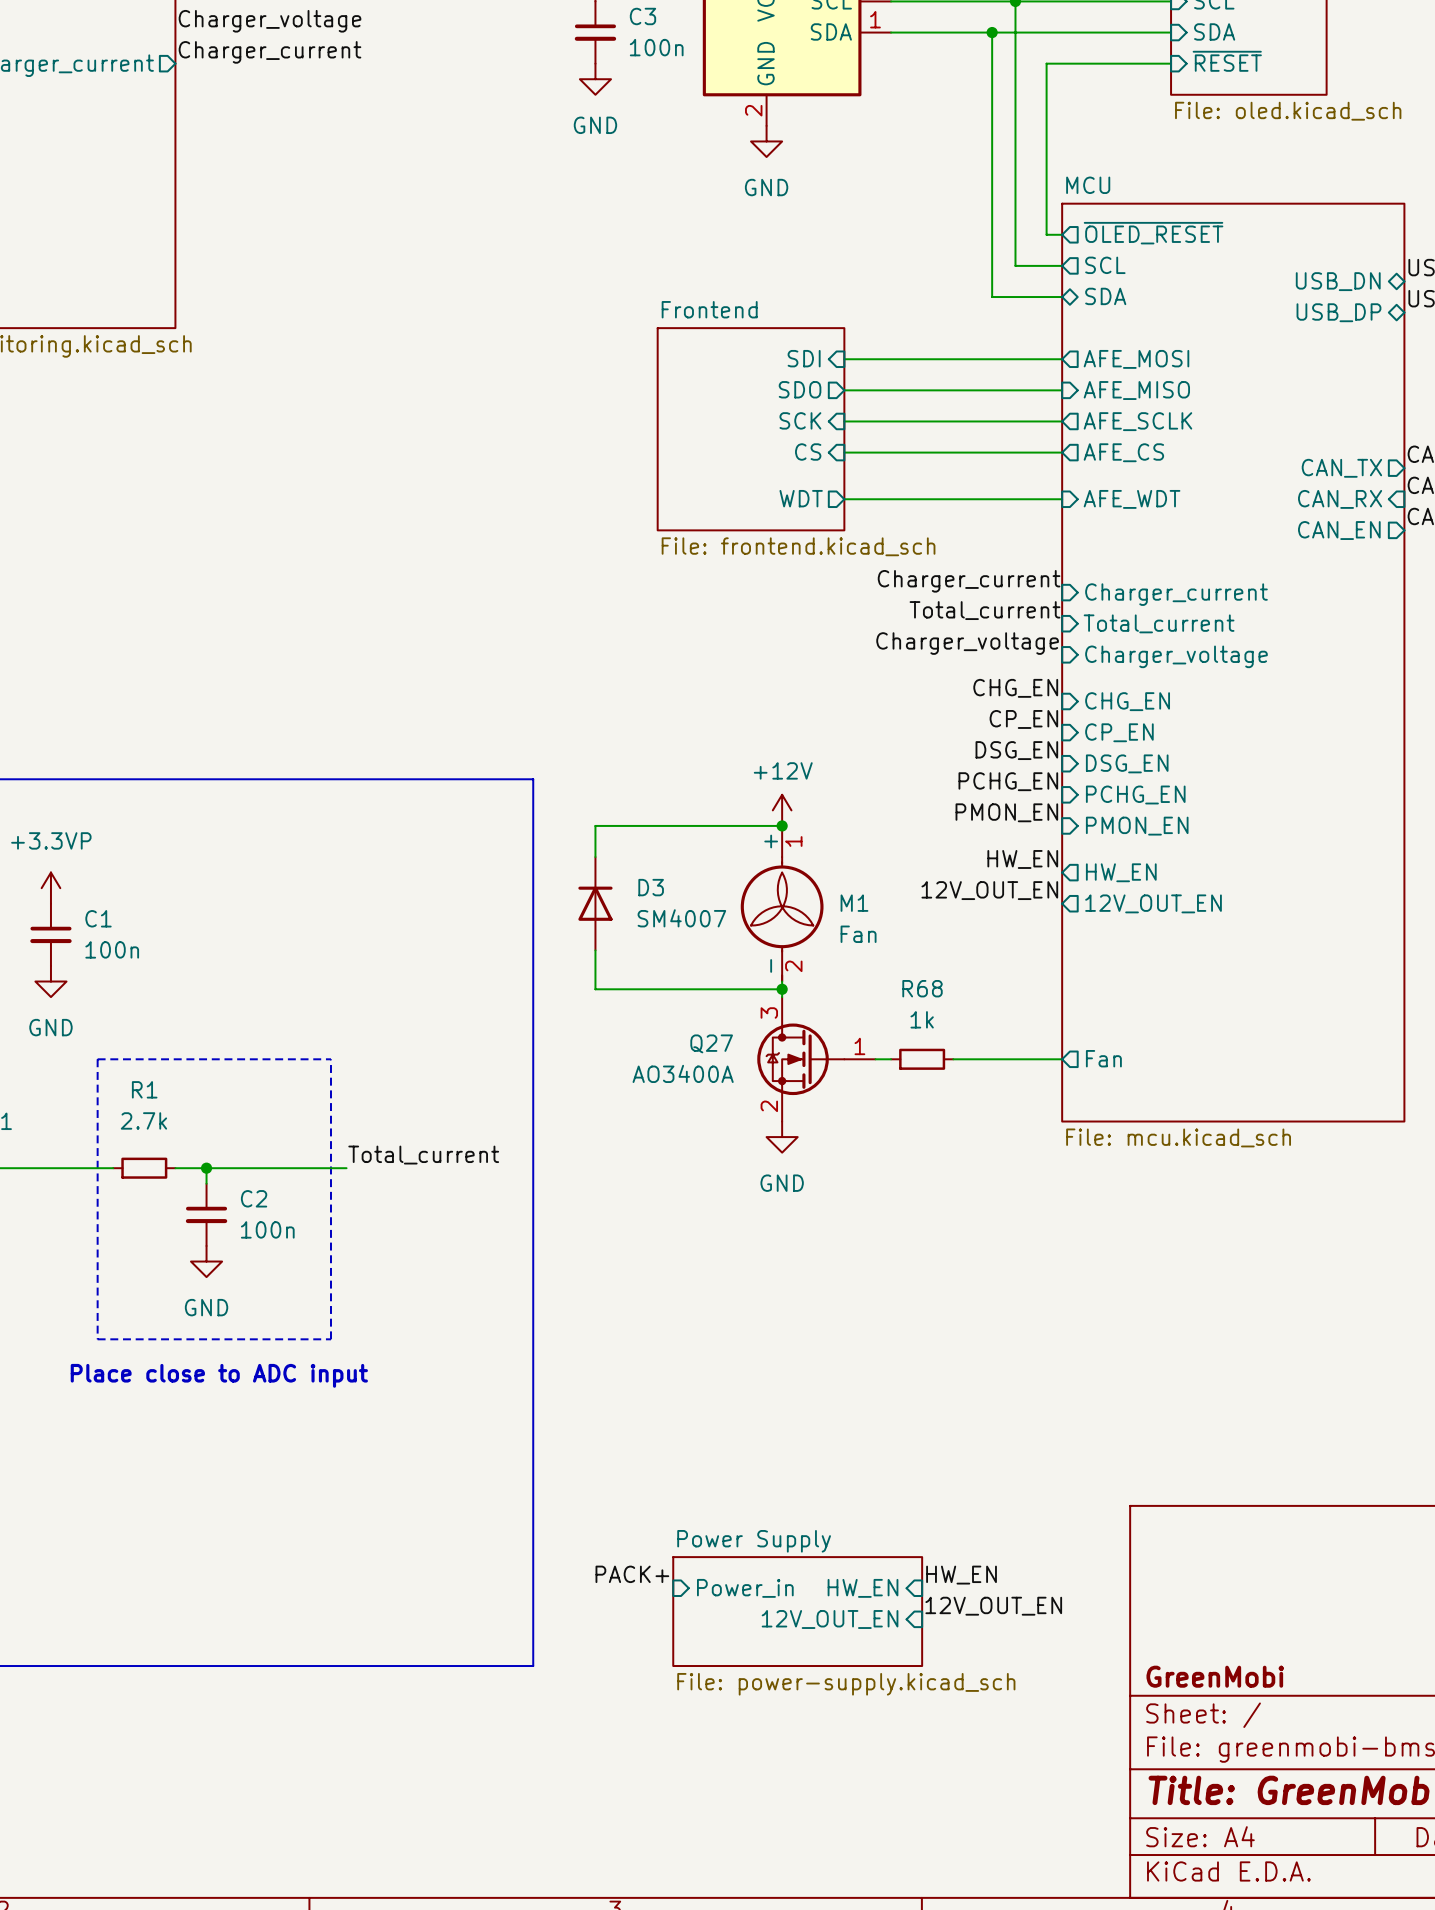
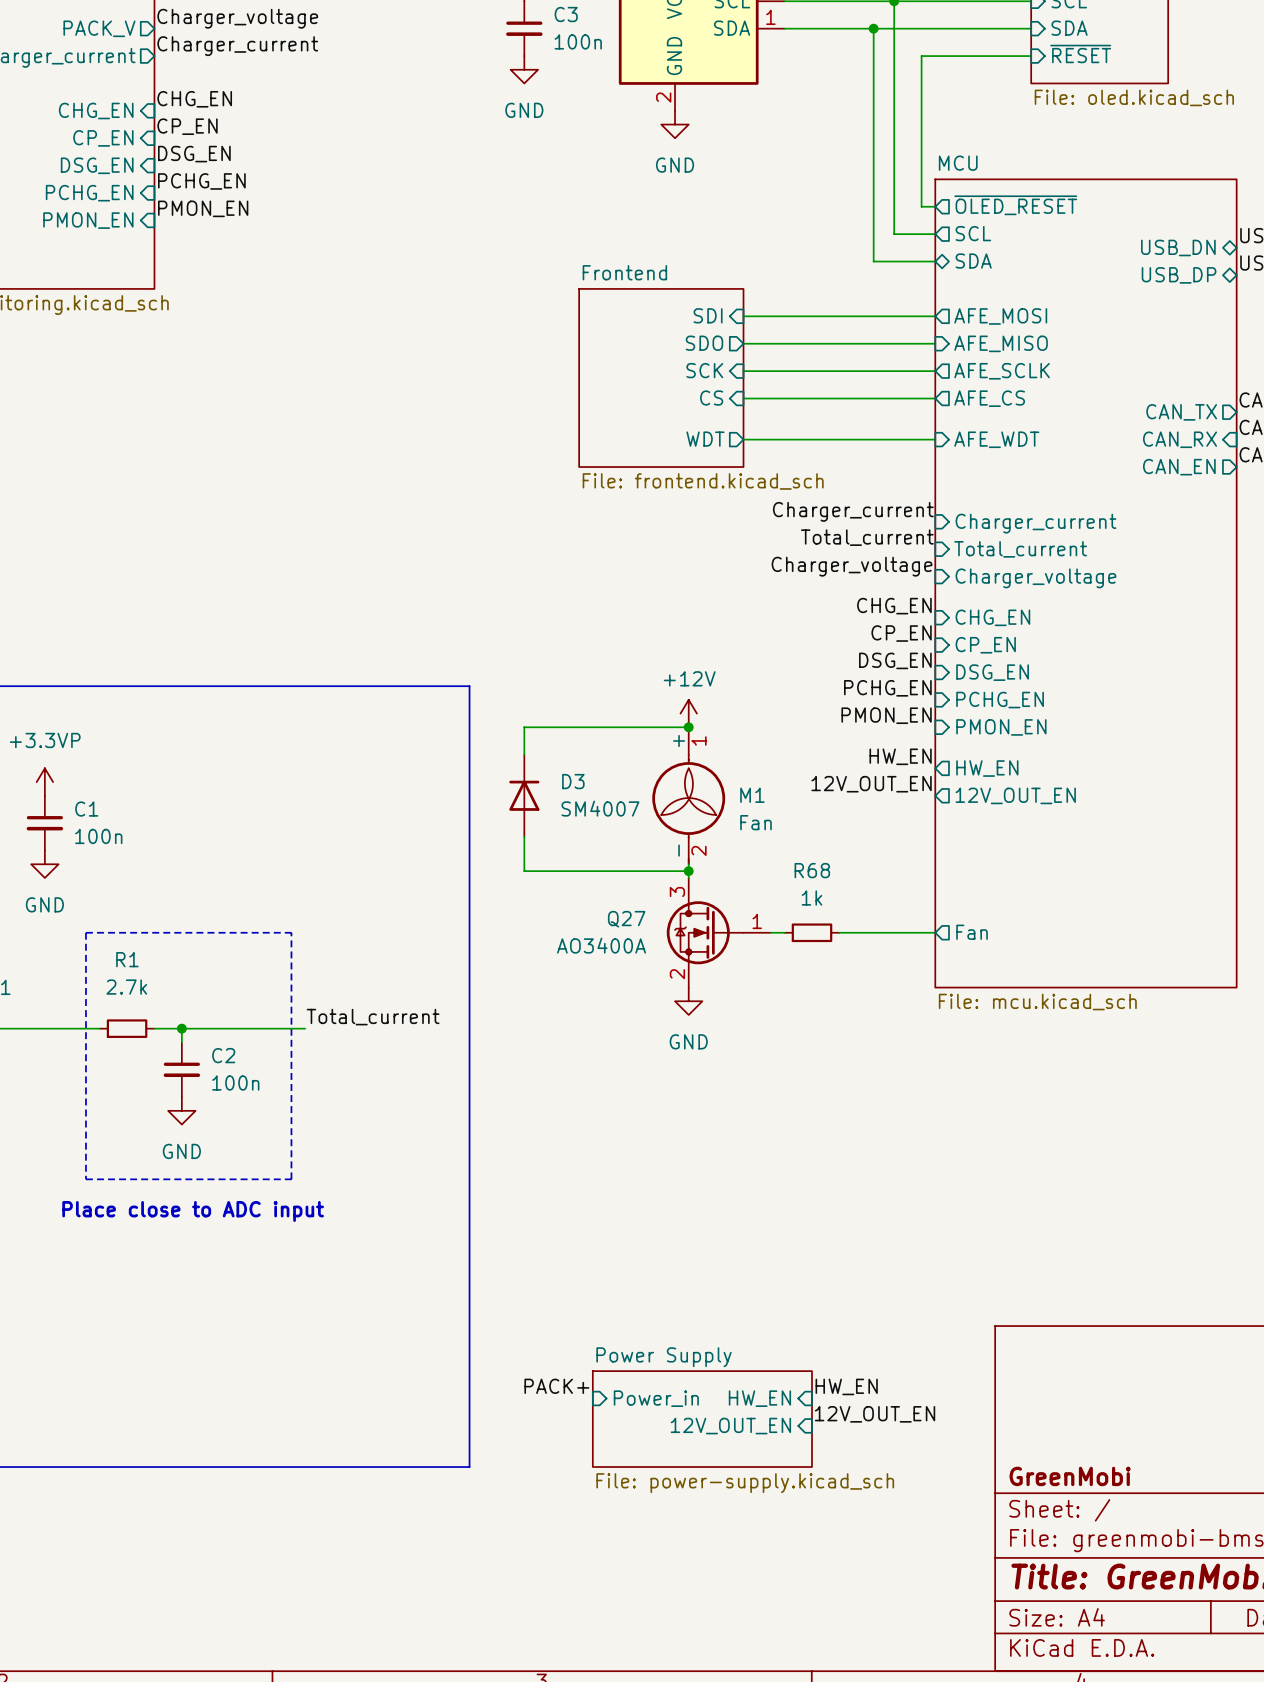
sheet pin: none -> PACK_V (99, 28)
label: none -> CHG_EN (194, 99)
sheet pin: none -> CHG_EN (96, 110)
label: none -> CP_EN (187, 126)
sheet pin: none -> CP_EN (103, 138)
label: none -> DSG_EN (194, 154)
sheet pin: none -> DSG_EN (97, 165)
label: none -> PCHG_EN (201, 181)
sheet pin: none -> PCHG_EN (89, 193)
label: none -> PMON_EN (203, 208)
sheet pin: none -> PMON_EN (88, 220)

